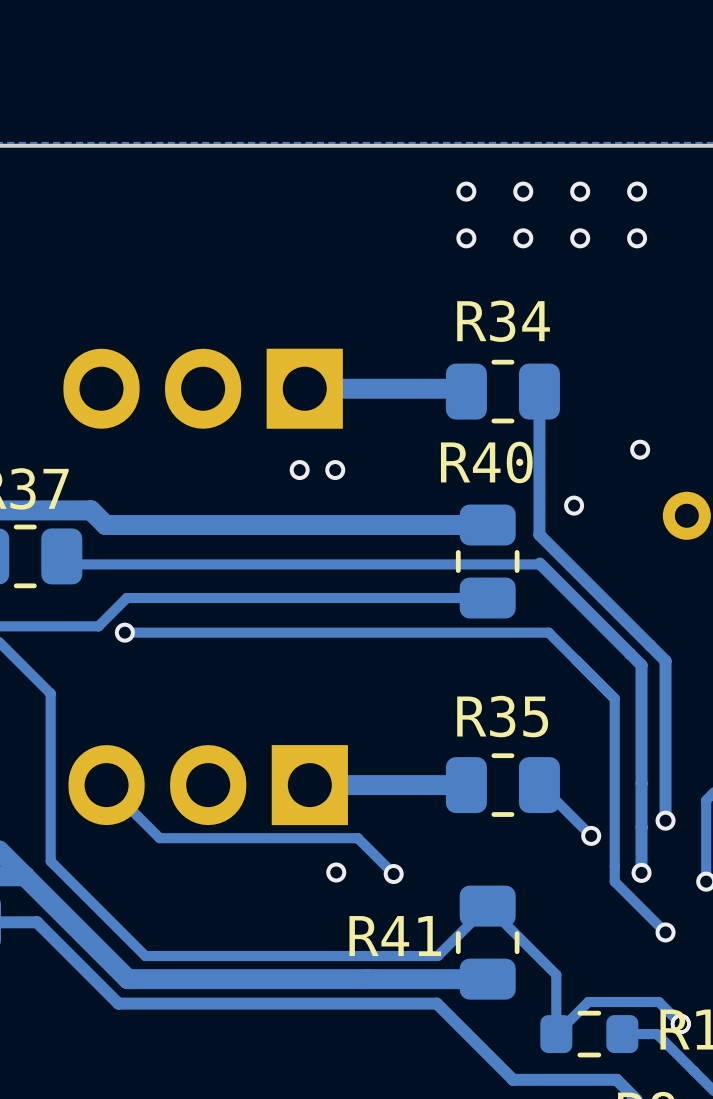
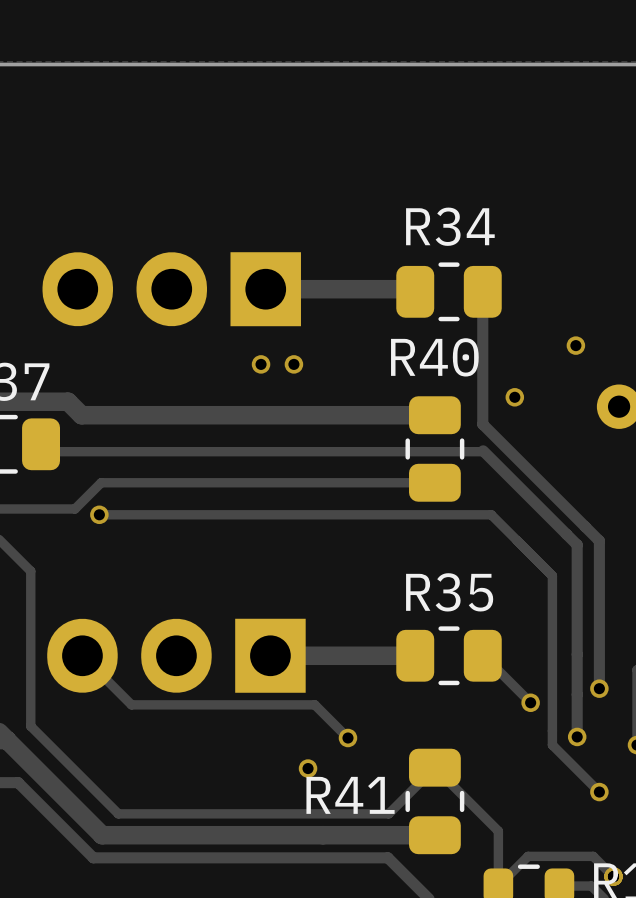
via: (466, 191) -> none
via: (523, 191) -> none
via: (580, 191) -> none
via: (637, 191) -> none
via: (466, 238) -> none
via: (523, 238) -> none
via: (580, 238) -> none
via: (637, 238) -> none
via position: (336, 872) -> (308, 768)

